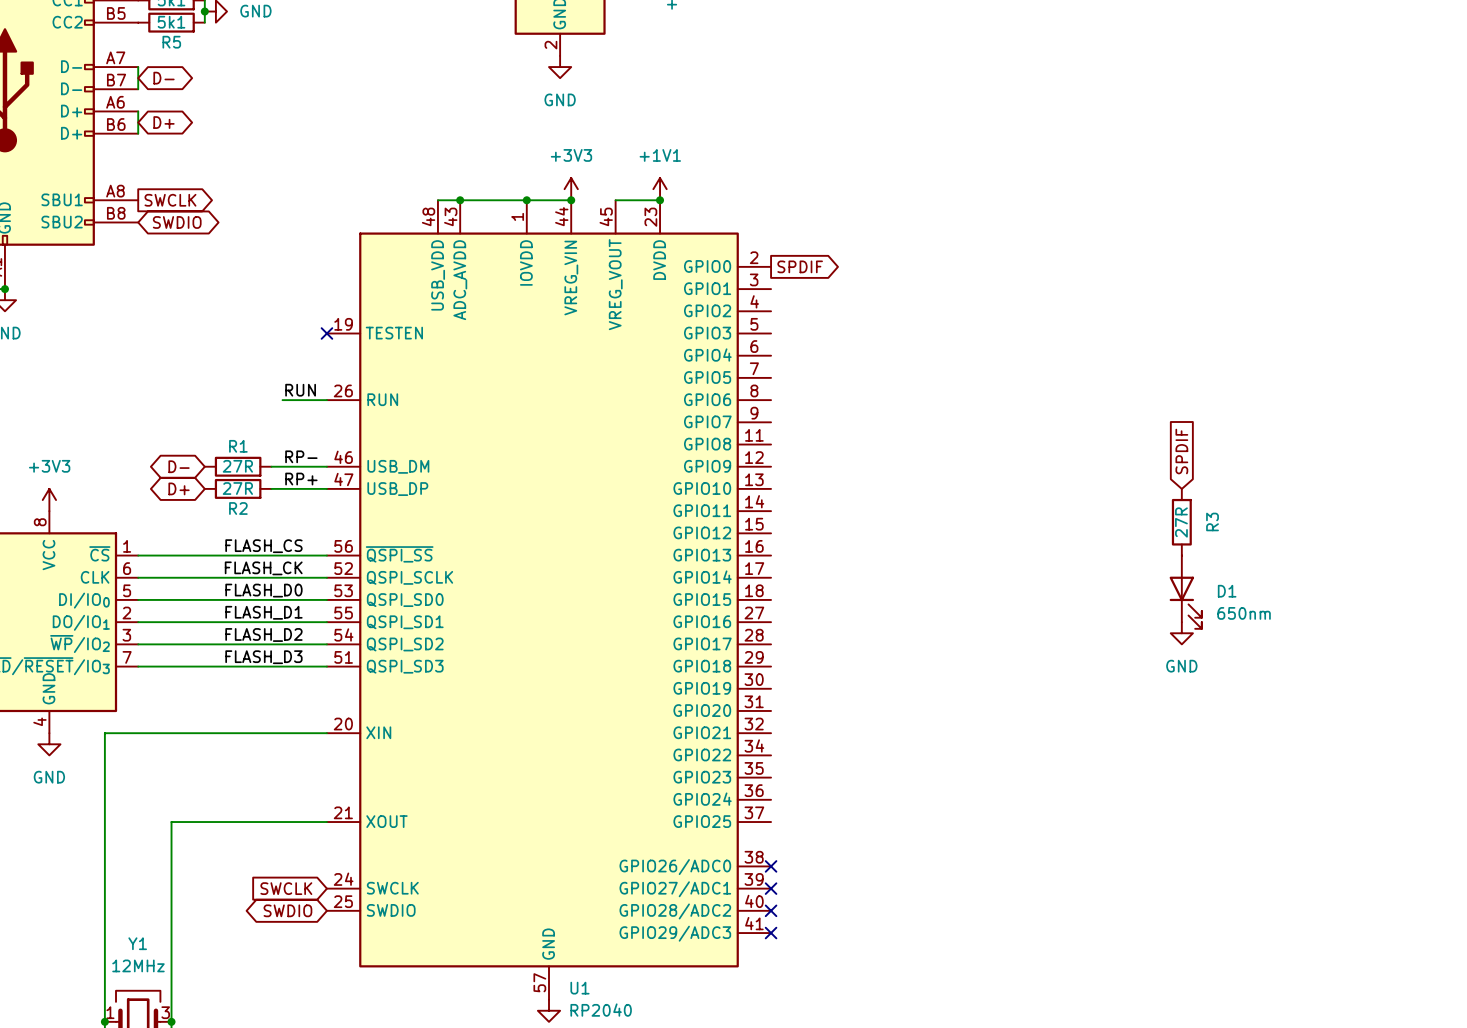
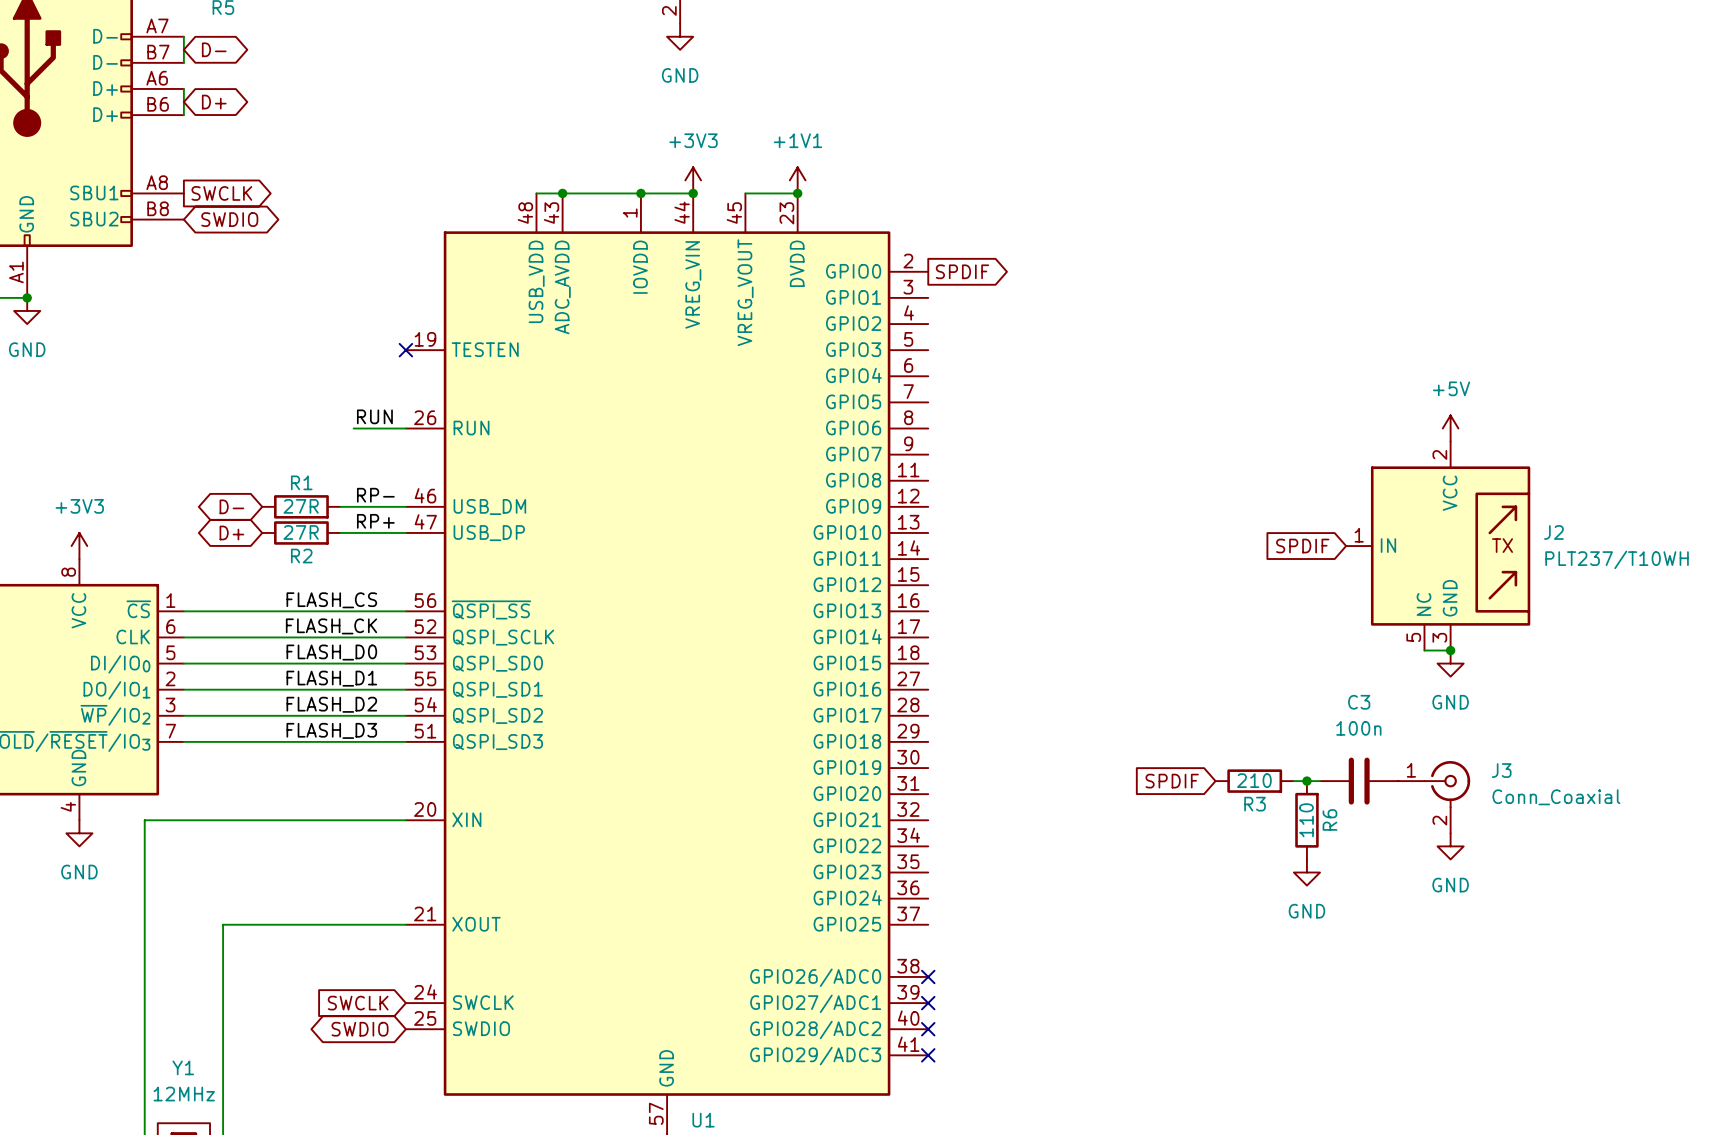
power symbol: none -> +5V (1450, 428)
global label rotation: 0° (1181, 451) -> 90° counterclockwise (1302, 546)
global label position: SPDIF (1181, 451) -> SPDIF (1302, 546)
J2: none -> PLT237/T10WH (1438, 546)
R3 rotation: 0° (1181, 522) -> 90° clockwise (1254, 781)
R3 position: (1181, 522) -> (1254, 781)
R3 value: 27R (1181, 522) -> 210 (1254, 780)
wire: none -> (1424, 650) (1450, 650)
junction: none -> (1450, 650)
D1: 650nm (1185, 592) -> none
power symbol position: GND (1181, 633) -> GND (1450, 663)
global label: none -> SPDIF (1172, 781)
wire: none -> (1293, 781) (1320, 781)
junction: none -> (1306, 781)
C3: none -> 100n (1359, 781)
J3: none -> Conn_Coaxial (1434, 797)
R6: none -> 110 (1306, 820)
power symbol: none -> GND (1450, 846)
power symbol: none -> GND (1306, 872)

